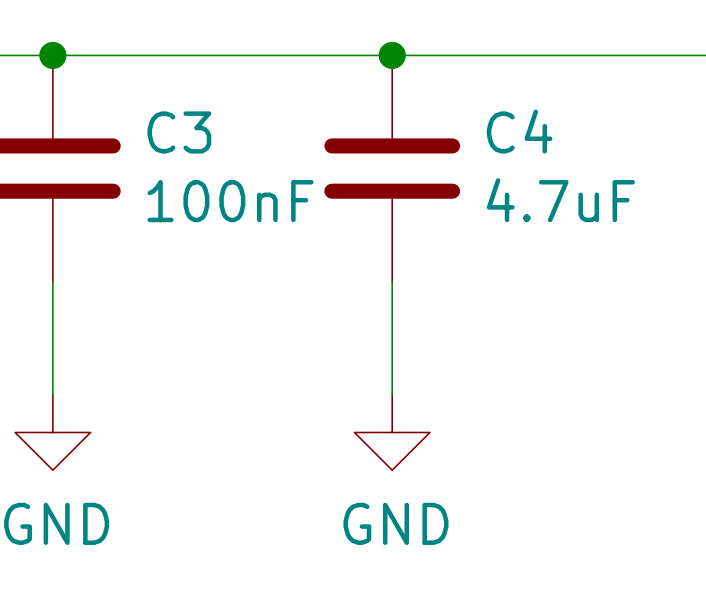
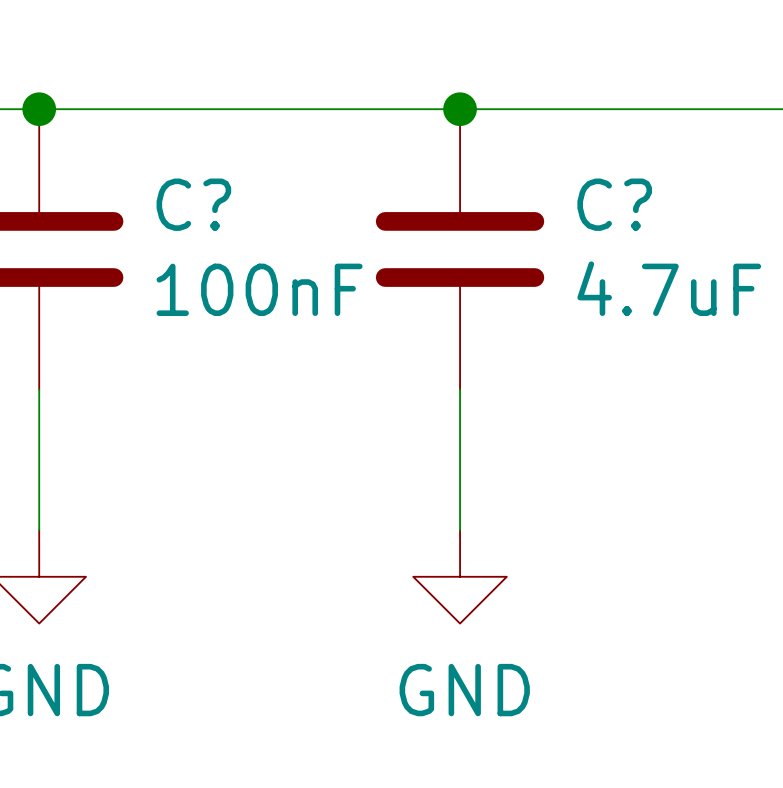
C4 name: C4 (519, 131) -> C? (614, 204)
C3 name: C3 (179, 132) -> C? (193, 204)

